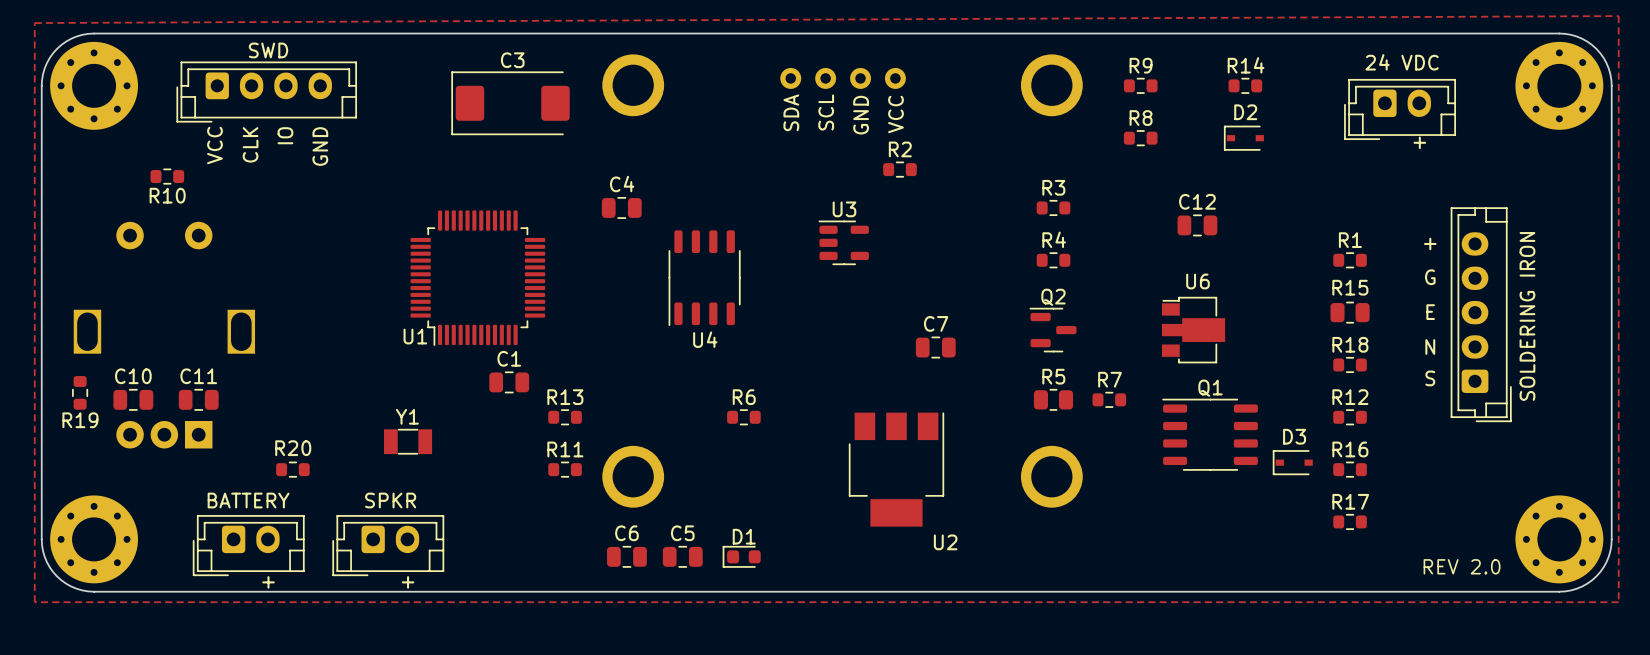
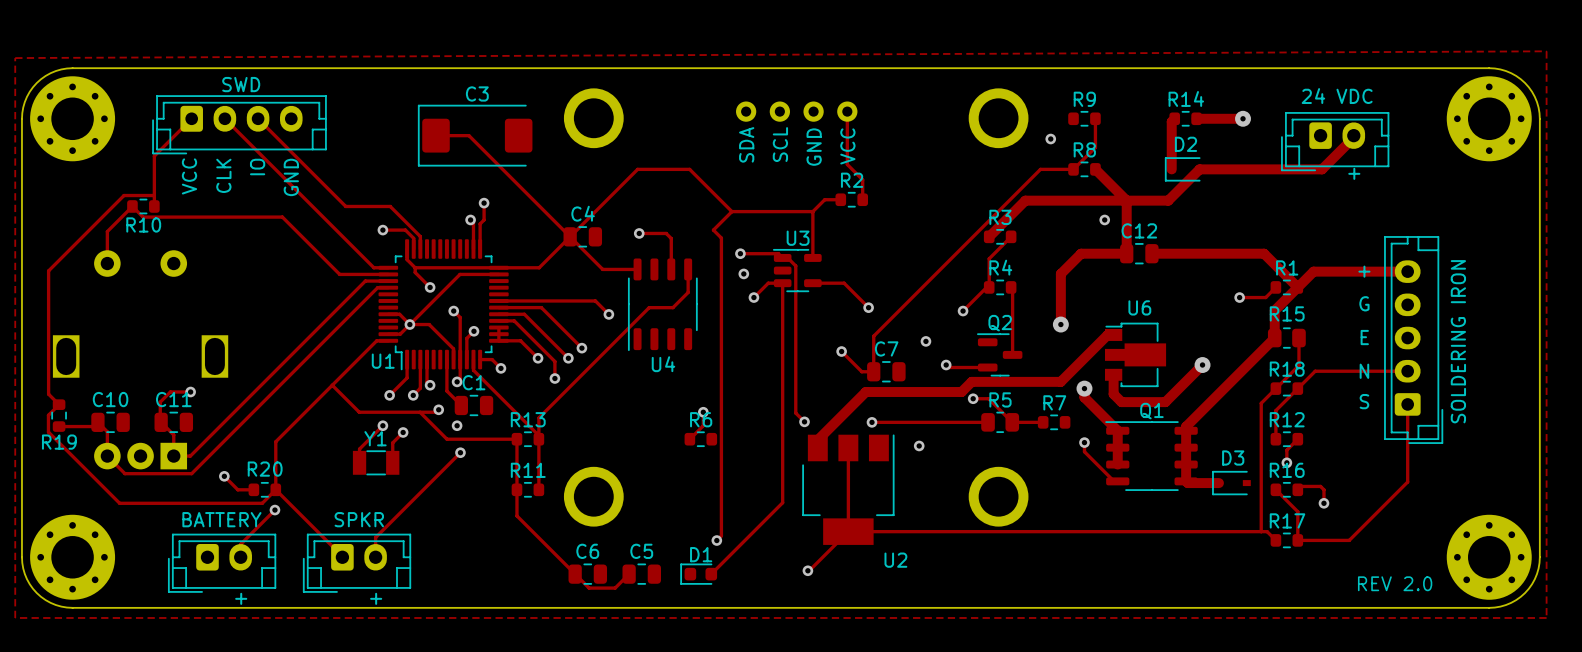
track: none -> (847, 111) (847, 164) (862, 179) (862, 199)
track: none -> (191, 118) (154, 156) (154, 206)
track: none -> (224, 118) (373, 267) (388, 267)
track: none -> (258, 118) (345, 206) (390, 206) (420, 236) (420, 249)
track: none -> (1095, 118) (1095, 147) (1073, 169) (1040, 169) (873, 336) (873, 371) (861, 371) (841, 351)
track: none -> (1174, 118) (1171, 121) (1171, 169)
track: none -> (1196, 118) (1243, 118)
via: none -> (1243, 118)
track: none -> (436, 135) (468, 135) (602, 269) (637, 269)
track: none -> (1353, 135) (1322, 169) (1199, 169) (1168, 200) (1025, 200) (989, 236)
via: none -> (1050, 139)
track: none -> (1095, 169) (1126, 200) (1126, 253) (1081, 253) (1060, 273) (1060, 324)
track: none -> (154, 195) (124, 195) (48, 270) (48, 394) (59, 404) (48, 415) (48, 432) (119, 503) (262, 503) (275, 489)
track: none -> (840, 199) (824, 199) (812, 211)
track: none -> (484, 203) (484, 219) (480, 223) (480, 249)
via: none -> (484, 203)
track: none -> (731, 211) (713, 230) (721, 238) (721, 535) (716, 540)
track: none -> (731, 211) (812, 211)
track: none -> (731, 211) (689, 169) (637, 169) (539, 267) (415, 267)
track: none -> (812, 211) (812, 257)
track: none -> (470, 219) (473, 222) (473, 249)
via: none -> (470, 219)
via: none -> (1104, 219)
track: none -> (382, 230) (405, 230) (413, 238) (413, 249)
via: none -> (382, 230)
track: none -> (639, 233) (666, 233) (671, 238) (671, 269)
via: none -> (639, 233)
track: none -> (1011, 236) (989, 258) (989, 287) (986, 287) (963, 311)
track: none -> (407, 249) (407, 259) (415, 267)
track: none -> (740, 253) (778, 253) (782, 257) (787, 257) (795, 265) (795, 413) (804, 421)
via: none -> (740, 253)
track: none -> (1151, 253) (1264, 253) (1297, 287)
track: none -> (107, 263) (107, 231) (132, 206) (143, 217) (282, 217) (339, 274) (388, 274)
track: none -> (415, 267) (415, 272) (430, 287)
track: none -> (688, 269) (688, 292) (672, 307) (649, 307) (538, 417) (538, 489)
track: none -> (1407, 271) (1313, 271) (1274, 310) (1274, 338) (1186, 426) (1186, 481) (1187, 483) (1218, 483)
track: none -> (498, 274) (459, 274) (400, 334) (388, 334)
via: none -> (743, 273)
track: none -> (388, 281) (365, 281) (190, 456) (173, 456) (173, 434) (160, 421) (160, 402) (170, 391) (190, 391)
track: none -> (812, 283) (844, 283) (868, 307)
track: none -> (388, 287) (377, 287) (191, 473) (124, 473) (107, 456) (107, 431) (97, 422) (93, 426) (59, 426)
via: none -> (430, 287)
track: none -> (1011, 287) (1012, 354)
track: none -> (1275, 287) (1265, 297) (1239, 297)
track: none -> (753, 297) (768, 283) (782, 283) (782, 502) (711, 574)
via: none -> (753, 297)
via: none -> (1239, 297)
track: none -> (498, 300) (595, 300) (608, 314)
track: none -> (498, 307) (541, 307) (581, 348)
via: none -> (868, 307)
track: none -> (453, 311) (460, 317) (460, 378) (457, 381)
via: none -> (453, 311)
via: none -> (963, 311)
track: none -> (388, 314) (399, 314) (409, 324) (429, 324) (453, 348) (453, 359)
track: none -> (498, 314) (524, 314) (568, 358)
via: none -> (608, 314)
track: none -> (498, 320) (514, 320) (554, 361) (554, 378)
via: none -> (409, 324)
via: none -> (1060, 324)
track: none -> (498, 327) (498, 340) (520, 340) (538, 358)
track: none -> (473, 331) (466, 338) (466, 359)
via: none -> (473, 331)
track: none -> (1111, 334) (1113, 334) (1107, 334) (1060, 381) (971, 381) (961, 391) (865, 391) (817, 440) (817, 447)
track: none -> (1298, 338) (1298, 365) (1261, 403) (1261, 531)
track: none -> (388, 340) (376, 340) (275, 441) (275, 489)
via: none -> (925, 341)
via: none -> (581, 348)
via: none -> (841, 351)
via: none -> (538, 358)
via: none -> (568, 358)
track: none -> (407, 359) (407, 377) (389, 395)
track: none -> (420, 359) (420, 388) (413, 395)
track: none -> (427, 359) (427, 382) (430, 385)
track: none -> (446, 359) (446, 391) (461, 405)
track: none -> (473, 359) (473, 370) (538, 435)
track: none -> (480, 359) (492, 359) (500, 368)
track: none -> (946, 365) (948, 367) (987, 367)
via: none -> (946, 365)
track: none -> (1202, 365) (1165, 402) (1121, 402) (1113, 394) (1113, 374)
via: none -> (1202, 365)
via: none -> (500, 368)
track: none -> (1407, 371) (1315, 371) (1275, 410) (1275, 439)
via: none -> (554, 378)
via: none -> (457, 381)
track: none -> (332, 385) (359, 412) (436, 412) (438, 409)
via: none -> (430, 385)
track: none -> (1084, 388) (1084, 397) (1117, 430) (1117, 464)
via: none -> (1084, 388)
via: none -> (190, 391)
via: none -> (389, 395)
via: none -> (413, 395)
track: none -> (973, 398) (988, 398) (1012, 422) (1043, 422)
via: none -> (973, 398)
track: none -> (1407, 404) (1407, 482) (1349, 540) (1297, 540) (1297, 511) (1275, 489)
via: none -> (438, 409)
track: none -> (419, 412) (446, 439) (516, 439) (516, 515) (589, 588) (615, 588) (629, 574)
track: none -> (703, 412) (703, 425) (689, 439)
via: none -> (703, 412)
via: none -> (804, 421)
track: none -> (871, 422) (988, 422)
via: none -> (871, 422)
track: none -> (382, 425) (359, 449) (359, 462)
via: none -> (382, 425)
via: none -> (457, 425)
track: none -> (403, 432) (392, 442) (392, 462)
via: none -> (403, 432)
track: none -> (1297, 439) (1286, 450) (1286, 462)
track: none -> (1084, 442) (1084, 451) (1114, 481) (1117, 481)
via: none -> (1084, 442)
via: none -> (919, 445)
track: none -> (848, 447) (848, 531)
track: none -> (460, 452) (375, 537) (375, 557)
via: none -> (460, 452)
via: none -> (1286, 462)
track: none -> (224, 476) (237, 489) (253, 489)
via: none -> (224, 476)
track: none -> (275, 489) (342, 557)
track: none -> (1297, 489) (1301, 486) (1320, 486) (1323, 489) (1323, 503)
via: none -> (1323, 503)
track: none -> (274, 510) (240, 544) (240, 557)
via: none -> (274, 510)
track: none -> (848, 531) (1267, 531) (1275, 540)
track: none -> (848, 531) (807, 570)
via: none -> (716, 540)
via: none -> (807, 570)

